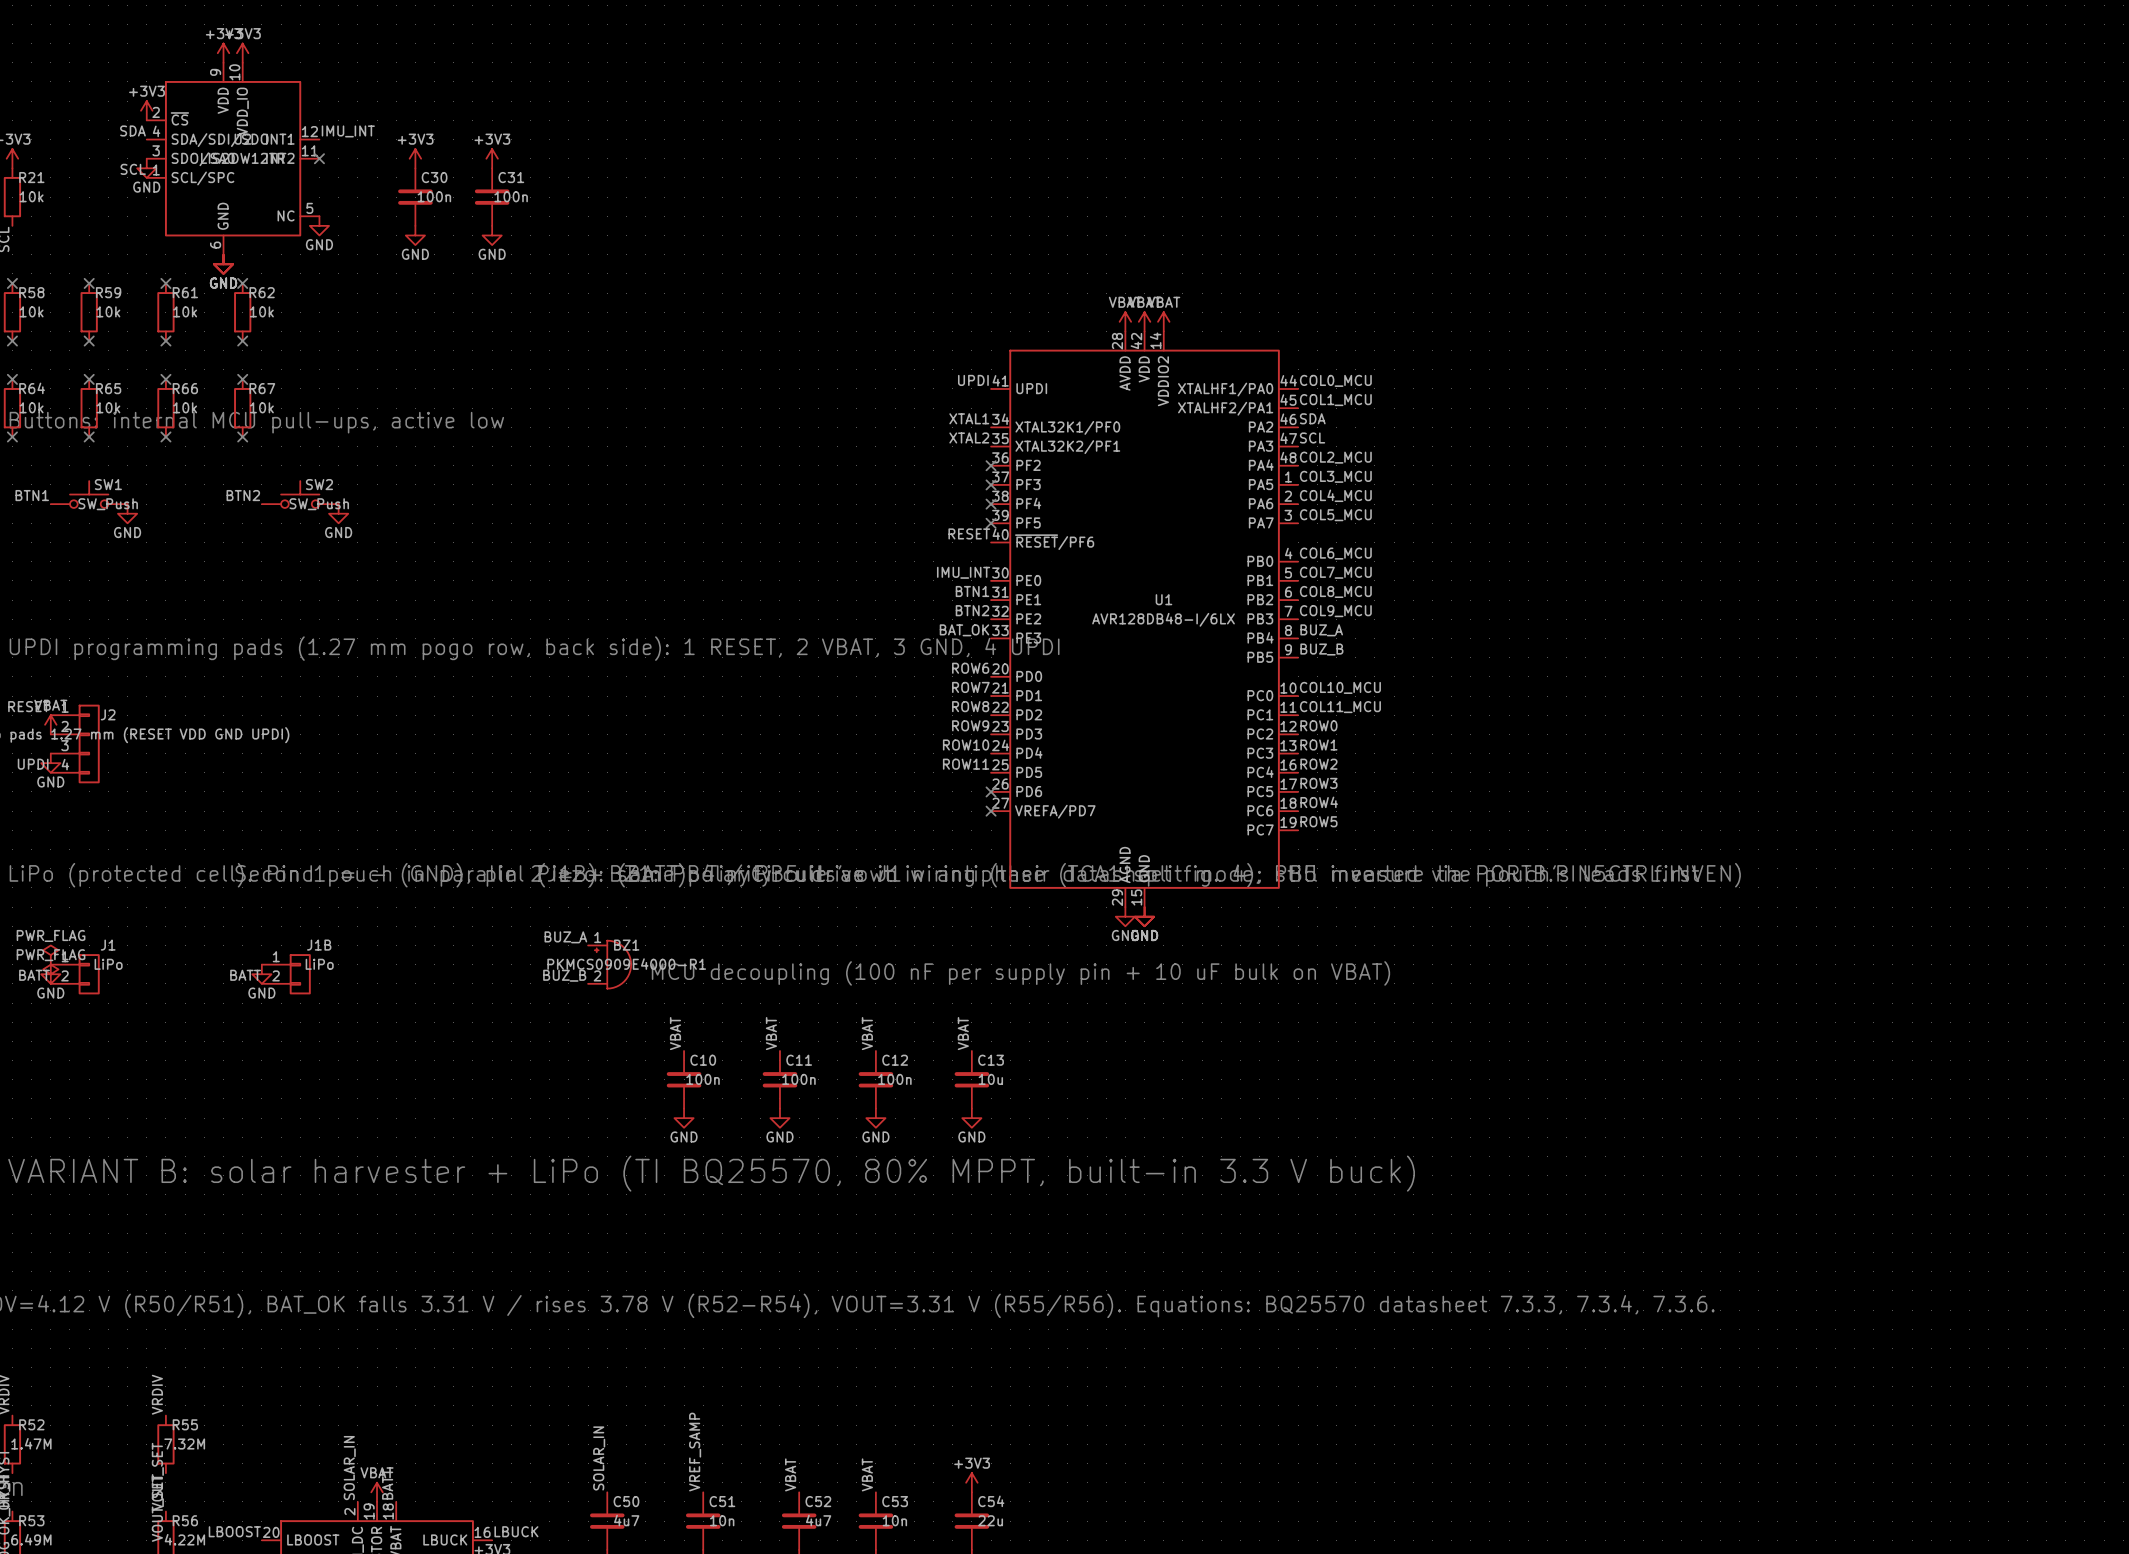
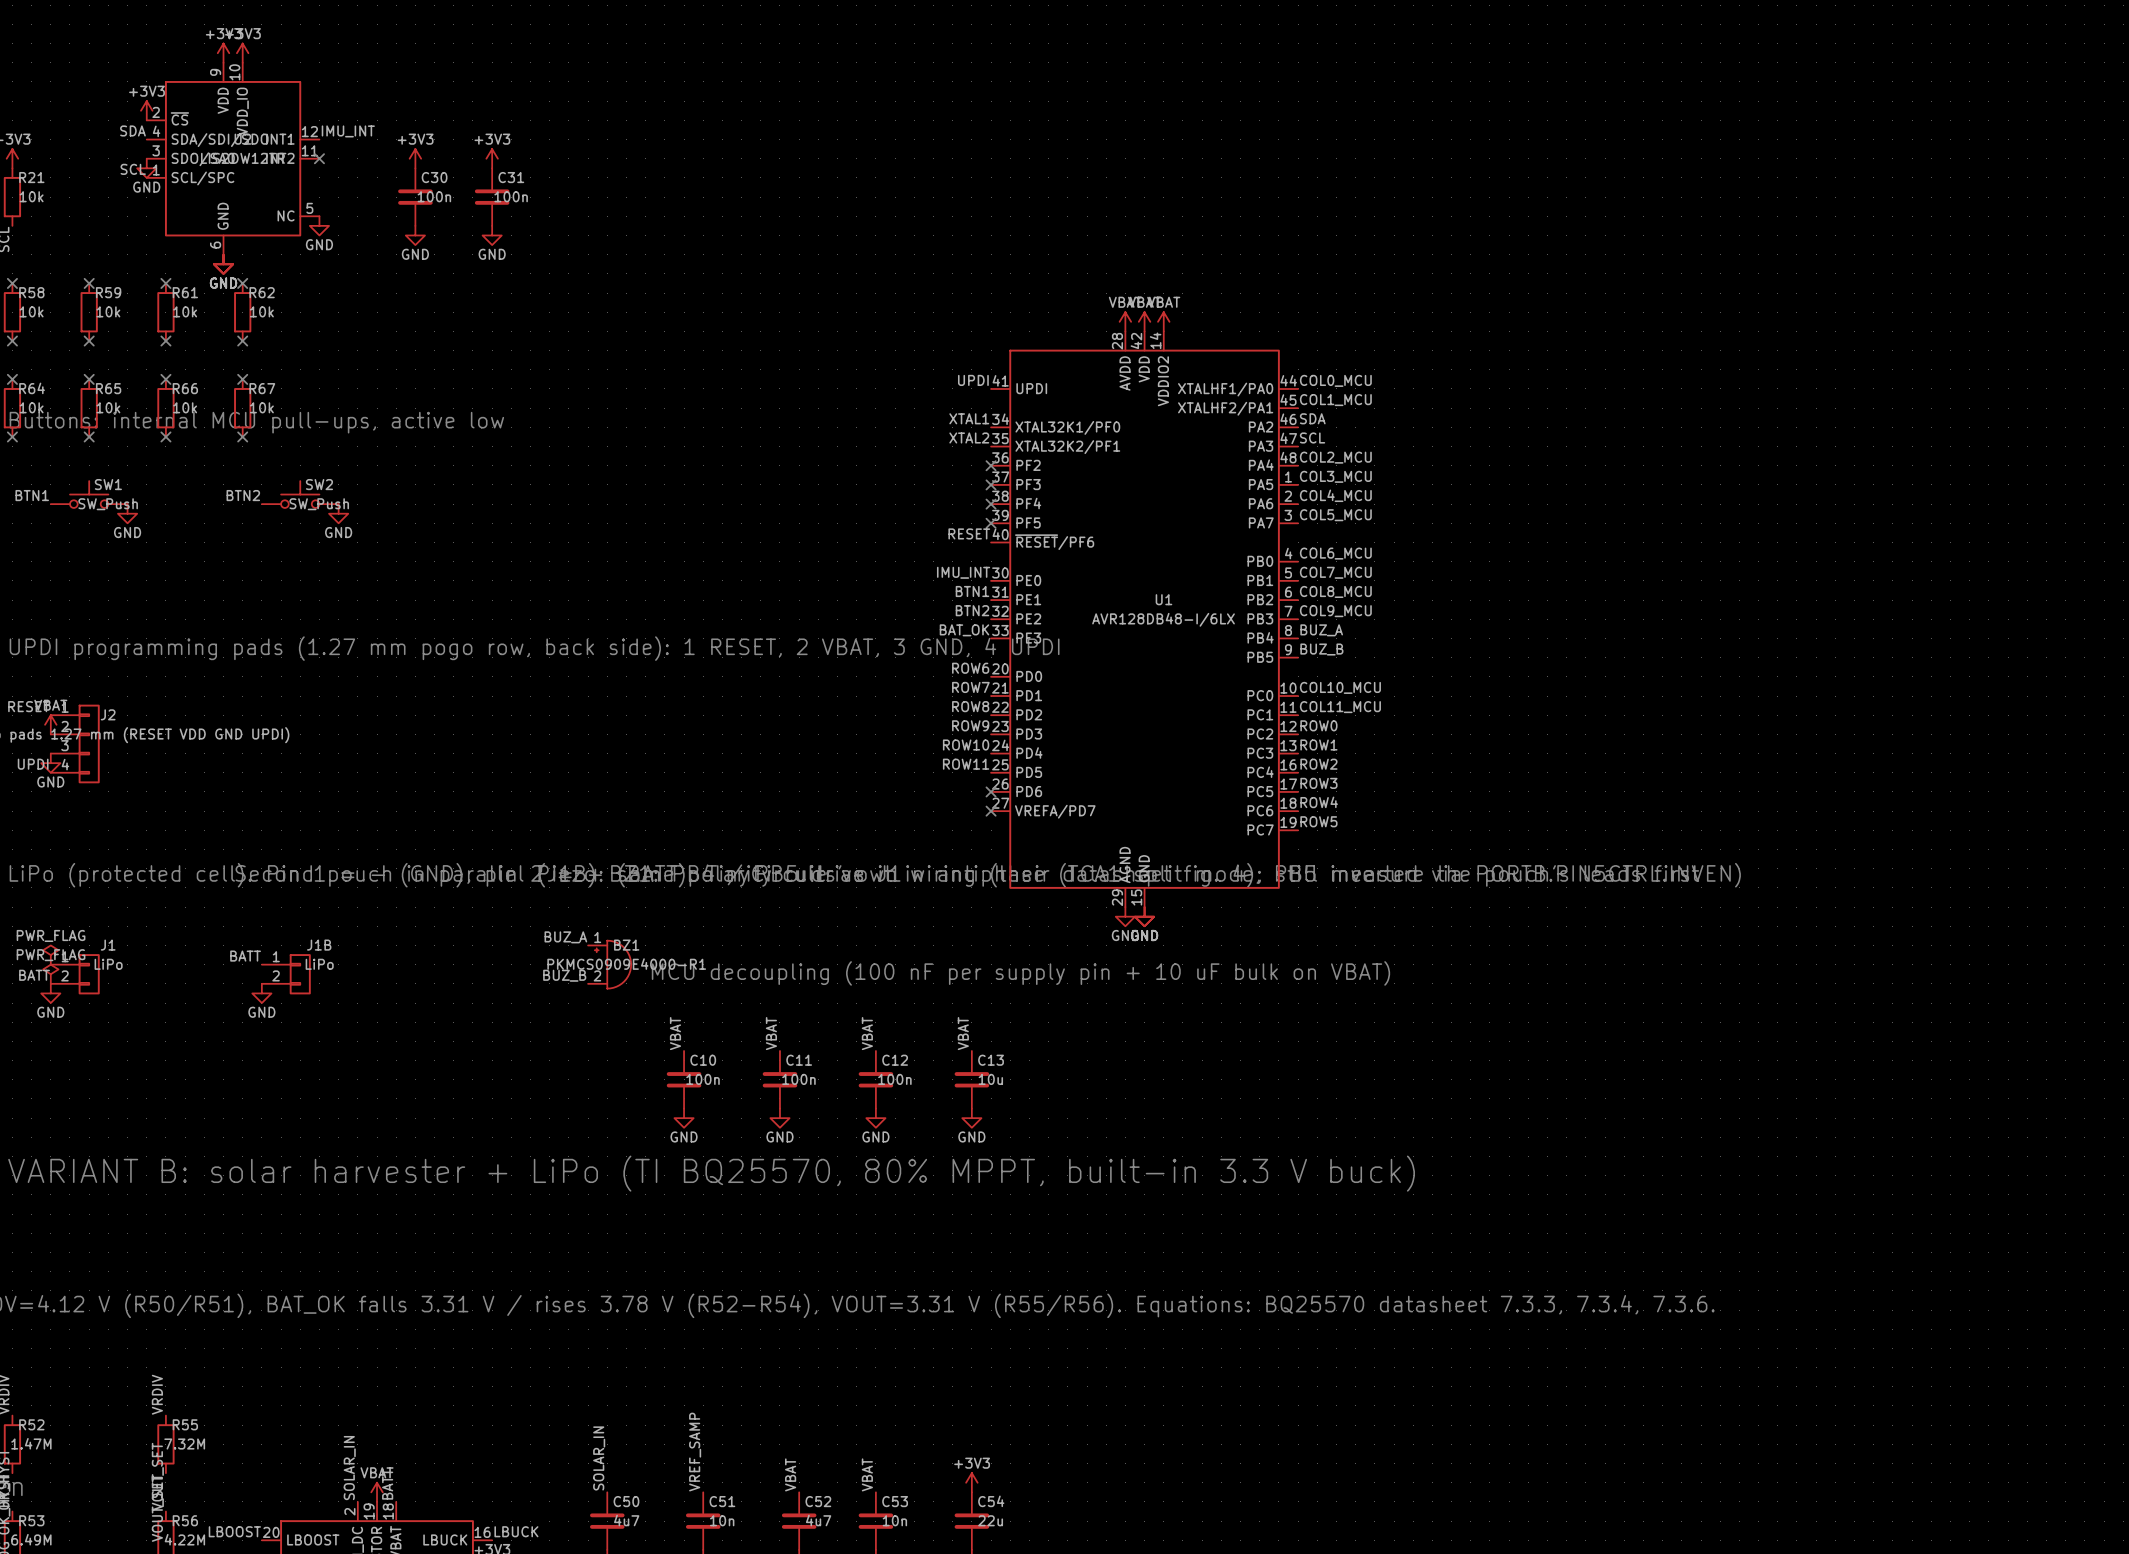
power symbol position: GND (50, 974) -> GND (50, 993)
power symbol position: GND (261, 974) -> GND (261, 993)
label position: BATT (245, 975) -> BATT (245, 956)

